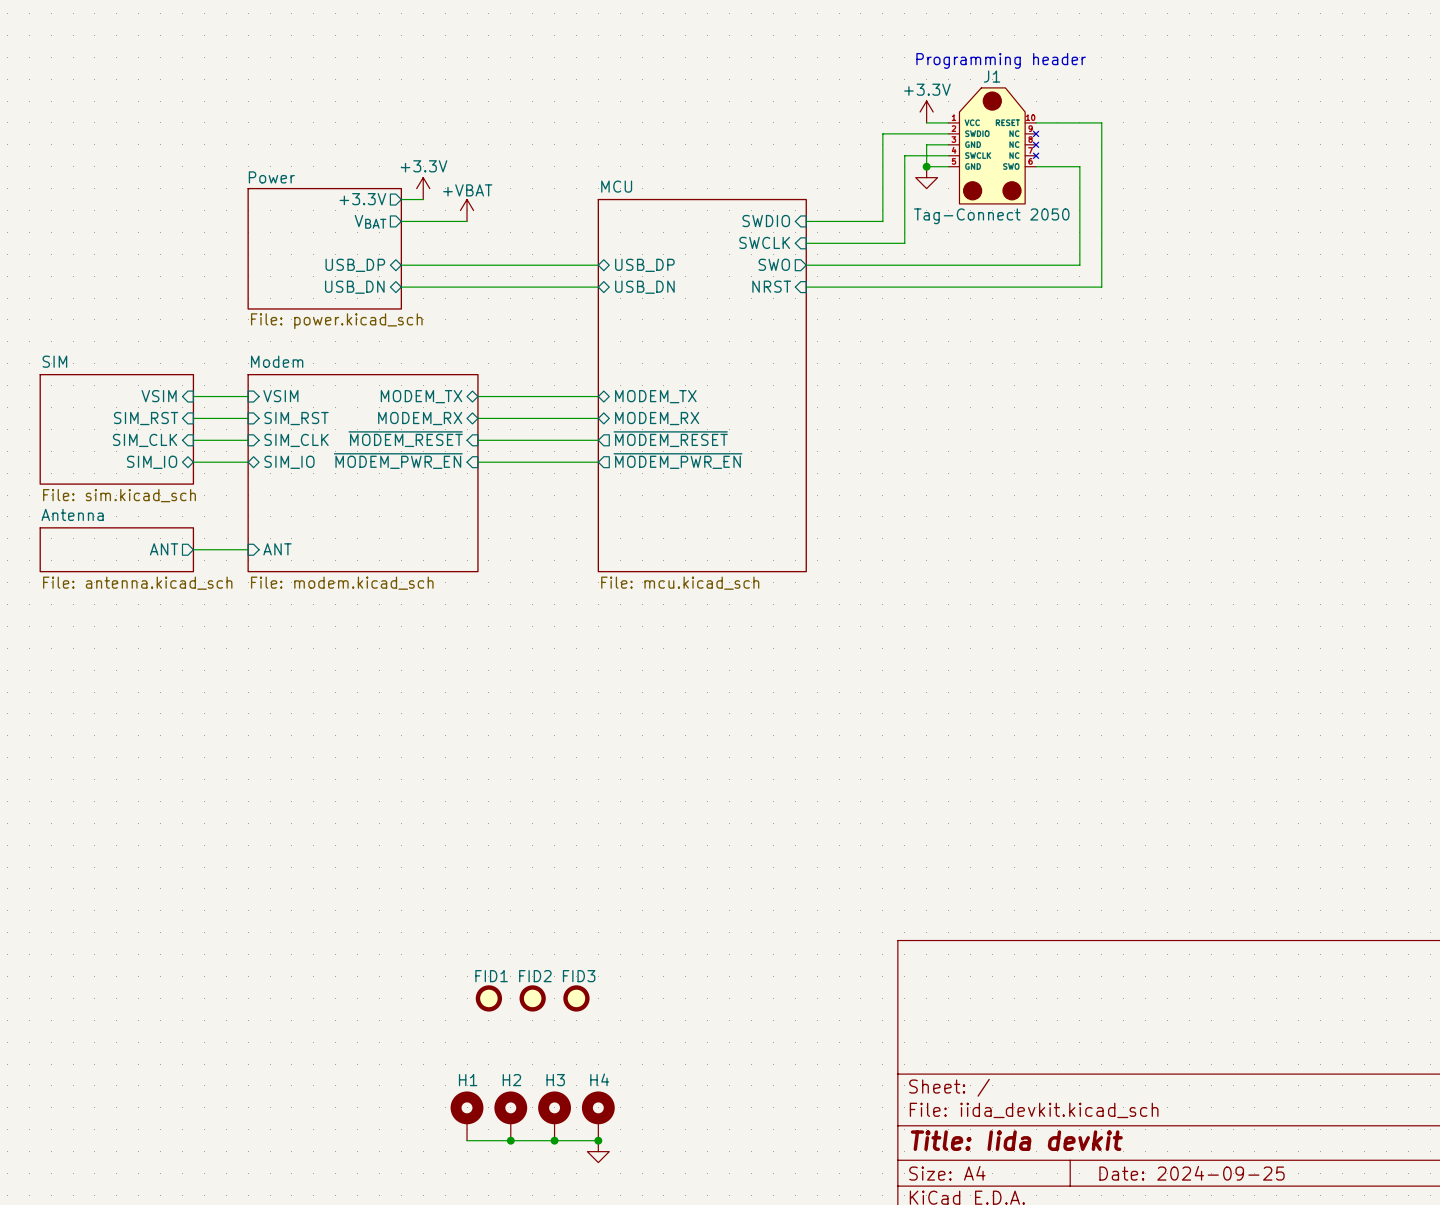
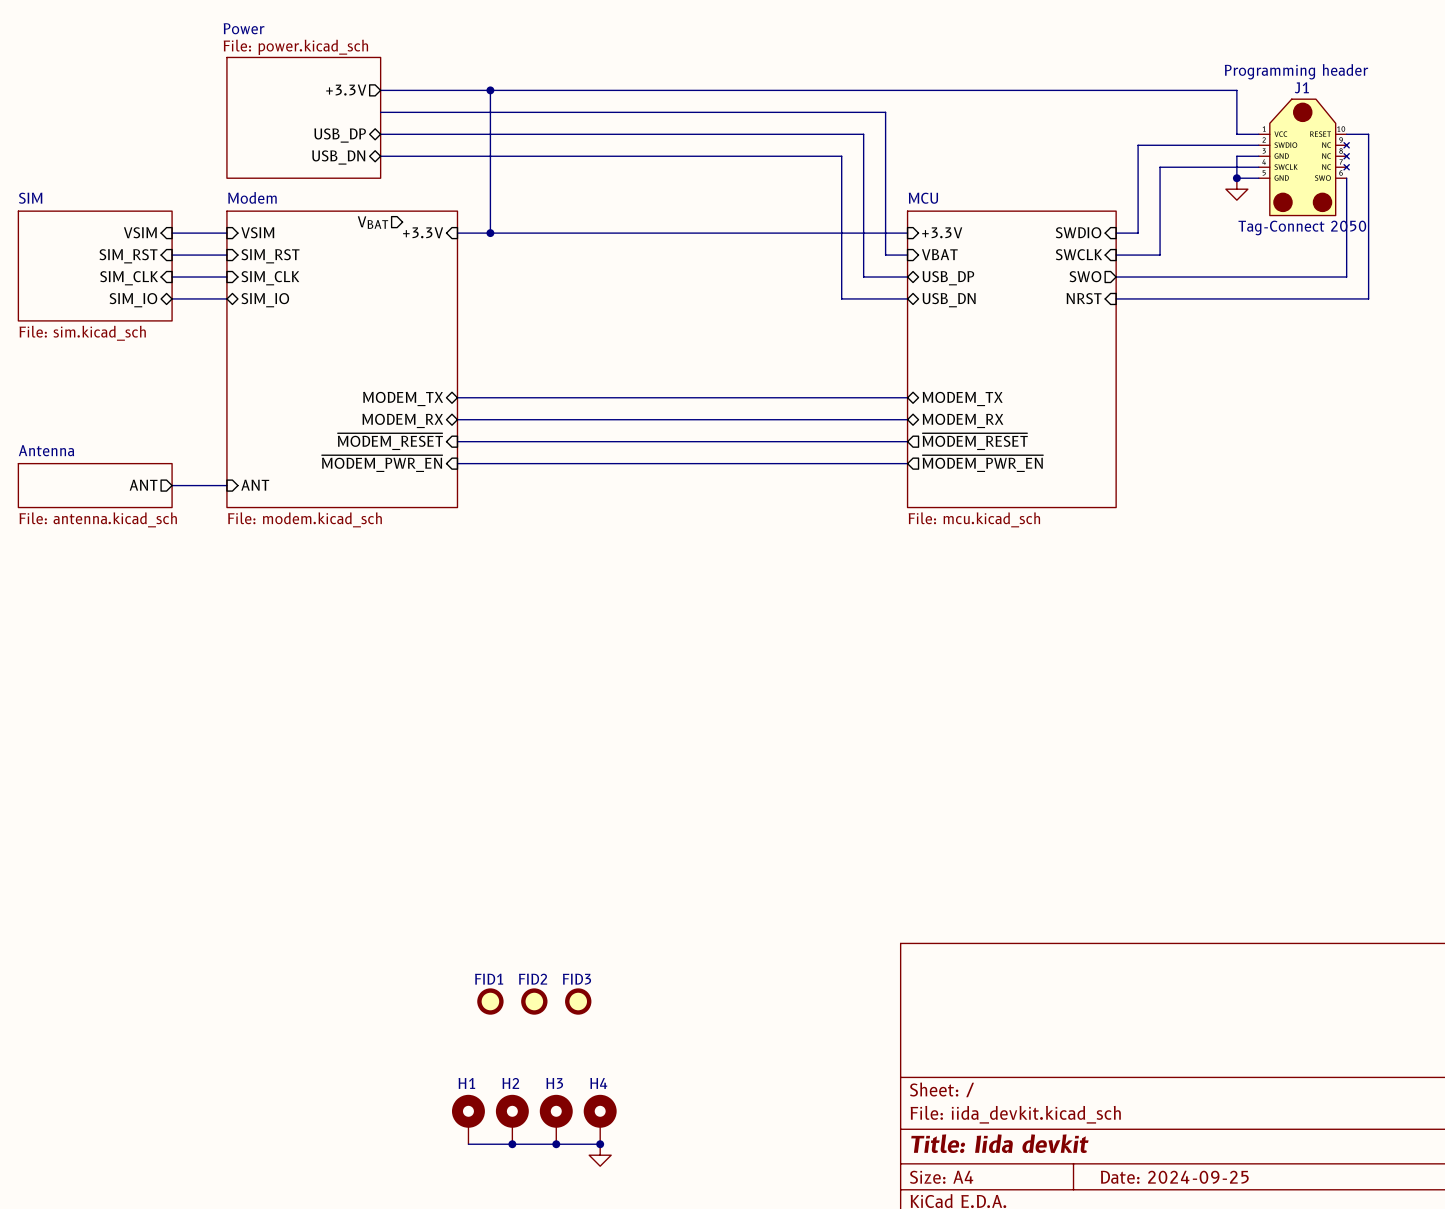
text: Programming header (1001, 60) -> none
text: none -> Programming header (1296, 71)
sheet pin: none -> +3.3V (346, 90)
wire: none -> (380, 90) (1236, 90) (1236, 134) (1258, 134)
wire: none -> (490, 90) (490, 233)
junction: none -> (490, 90)
power symbol: +3.3V (926, 112) -> none
wire: (926, 122) (948, 122) -> none
wire: (1036, 122) (1101, 122) (1101, 287) (806, 287) -> none
wire: none -> (380, 134) (863, 134) (863, 277) (907, 277)
wire: (882, 133) (948, 133) -> (885, 134) (885, 112) (380, 112)
wire: none -> (1346, 134) (1368, 134) (1368, 298) (1116, 298)
wire: (948, 144) (926, 144) (926, 166) (948, 166) -> none
wire: none -> (1258, 145) (1138, 145) (1138, 233) (1116, 233)
J1 position: (993, 145) -> (1304, 157)
wire: none -> (380, 156) (841, 156) (841, 298) (907, 298)
wire: (948, 155) (904, 155) (904, 243) (806, 243) -> none
wire: none -> (1258, 156) (1236, 156) (1236, 178) (1258, 178)
junction: (926, 166) -> none
wire: (1036, 166) (1079, 166) (1079, 265) (806, 265) -> none
wire: none -> (1258, 167) (1160, 167) (1160, 255) (1116, 255)
sheet Power name position: Power (271, 177) -> Power (244, 28)
power symbol: (926, 177) -> none
junction: none -> (1236, 178)
wire: none -> (1346, 178) (1346, 277) (1116, 277)
power symbol: +3.3V (423, 188) -> none
power symbol: none -> (1236, 189)
sheet pin: +3.3V (362, 199) -> none
wire: (401, 199) (423, 199) -> (457, 397) (479, 397)
power symbol: +VBAT (467, 210) -> none
wire: (401, 221) (467, 221) -> none
sheet pin: SWDIO (766, 221) -> none
wire: (806, 221) (882, 221) -> (907, 255) (885, 255) (885, 222)
sheet pin: none -> VSIM (140, 232)
sheet pin: none -> VSIM (257, 232)
sheet pin: none -> +3.3V (423, 232)
sheet pin: none -> +3.3V (942, 232)
sheet pin: none -> SWDIO (1078, 232)
wire: none -> (457, 233) (907, 233)
junction: none -> (490, 233)
sheet pin: SWCLK (764, 242) -> none
sheet Power position: (324, 248) -> (303, 117)
sheet pin: none -> VBAT (939, 254)
sheet pin: none -> SWCLK (1078, 254)
sheet pin: none -> SIM_RST (128, 256)
sheet pin: none -> SIM_RST (270, 256)
sheet pin: SWO (774, 264) -> none
sheet pin position: USB_DP (355, 265) -> USB_DP (340, 135)
wire: (401, 265) (598, 265) -> none
sheet pin: USB_DP (644, 265) -> none
sheet pin: none -> SWO (1085, 276)
sheet pin: none -> SIM_CLK (129, 278)
sheet pin: none -> SIM_CLK (270, 278)
sheet pin: none -> USB_DP (948, 278)
sheet pin: NRST (771, 286) -> none
sheet pin position: USB_DN (354, 287) -> USB_DN (338, 157)
wire: (401, 287) (598, 287) -> none
sheet pin: USB_DN (644, 287) -> none
sheet pin: none -> NRST (1084, 298)
sheet pin: none -> SIM_IO (133, 300)
sheet pin: none -> SIM_IO (265, 300)
sheet pin: none -> USB_DN (949, 300)
sheet Power value position: File: power.kicad_sch (336, 321) -> File: power.kicad_sch (295, 47)
sheet Modem: none -> File: modem.kicad_sch (342, 359)
sheet MCU: none -> File: mcu.kicad_sch (1011, 359)
sheet MCU: File: mcu.kicad_sch (702, 385) -> none
sheet pin: VSIM (159, 396) -> none
wire: (193, 396) (248, 396) -> (172, 233) (226, 233)
sheet pin: VSIM (280, 396) -> none
sheet pin position: MODEM_TX (421, 396) -> MODEM_TX (403, 398)
wire: none -> (600, 397) (907, 397)
sheet pin: MODEM_TX (655, 396) -> none
sheet pin: none -> MODEM_TX (962, 398)
sheet pin: SIM_RST (146, 418) -> none
wire: (193, 418) (248, 418) -> (172, 255) (226, 255)
sheet pin: SIM_RST (296, 418) -> none
sheet pin position: MODEM_RX (420, 418) -> MODEM_RX (402, 420)
wire: none -> (457, 419) (479, 419)
wire: none -> (600, 419) (907, 419)
sheet pin: MODEM_RX (657, 418) -> none
sheet pin: none -> MODEM_RX (963, 420)
sheet SIM position: (116, 429) -> (95, 266)
sheet pin position: ~{MODEM_RESET} (405, 439) -> ~{MODEM_RESET} (390, 441)
sheet pin: ~{MODEM_RESET} (670, 439) -> none
sheet pin: none -> ~{MODEM_RESET} (975, 441)
sheet pin: SIM_CLK (145, 440) -> none
wire: (193, 440) (248, 440) -> (172, 277) (226, 277)
sheet pin: SIM_CLK (296, 440) -> none
wire: none -> (457, 441) (479, 441)
wire: none -> (600, 441) (907, 441)
sheet pin position: ~{MODEM_PWR_EN} (398, 461) -> ~{MODEM_PWR_EN} (382, 463)
sheet pin: ~{MODEM_PWR_EN} (677, 461) -> none
sheet pin: none -> ~{MODEM_PWR_EN} (982, 463)
sheet pin: SIM_IO (152, 462) -> none
wire: (193, 462) (248, 462) -> (172, 298) (226, 298)
sheet pin: SIM_IO (289, 462) -> none
wire: none -> (457, 463) (479, 463)
wire: none -> (600, 463) (907, 463)
sheet Modem: File: modem.kicad_sch (363, 473) -> none
sheet pin: none -> ANT (143, 485)
sheet pin: none -> ANT (255, 485)
sheet Antenna position: (116, 549) -> (95, 485)
sheet pin: ANT (164, 549) -> none
wire: (193, 549) (248, 549) -> (172, 485) (226, 485)
sheet pin: ANT (277, 549) -> none

